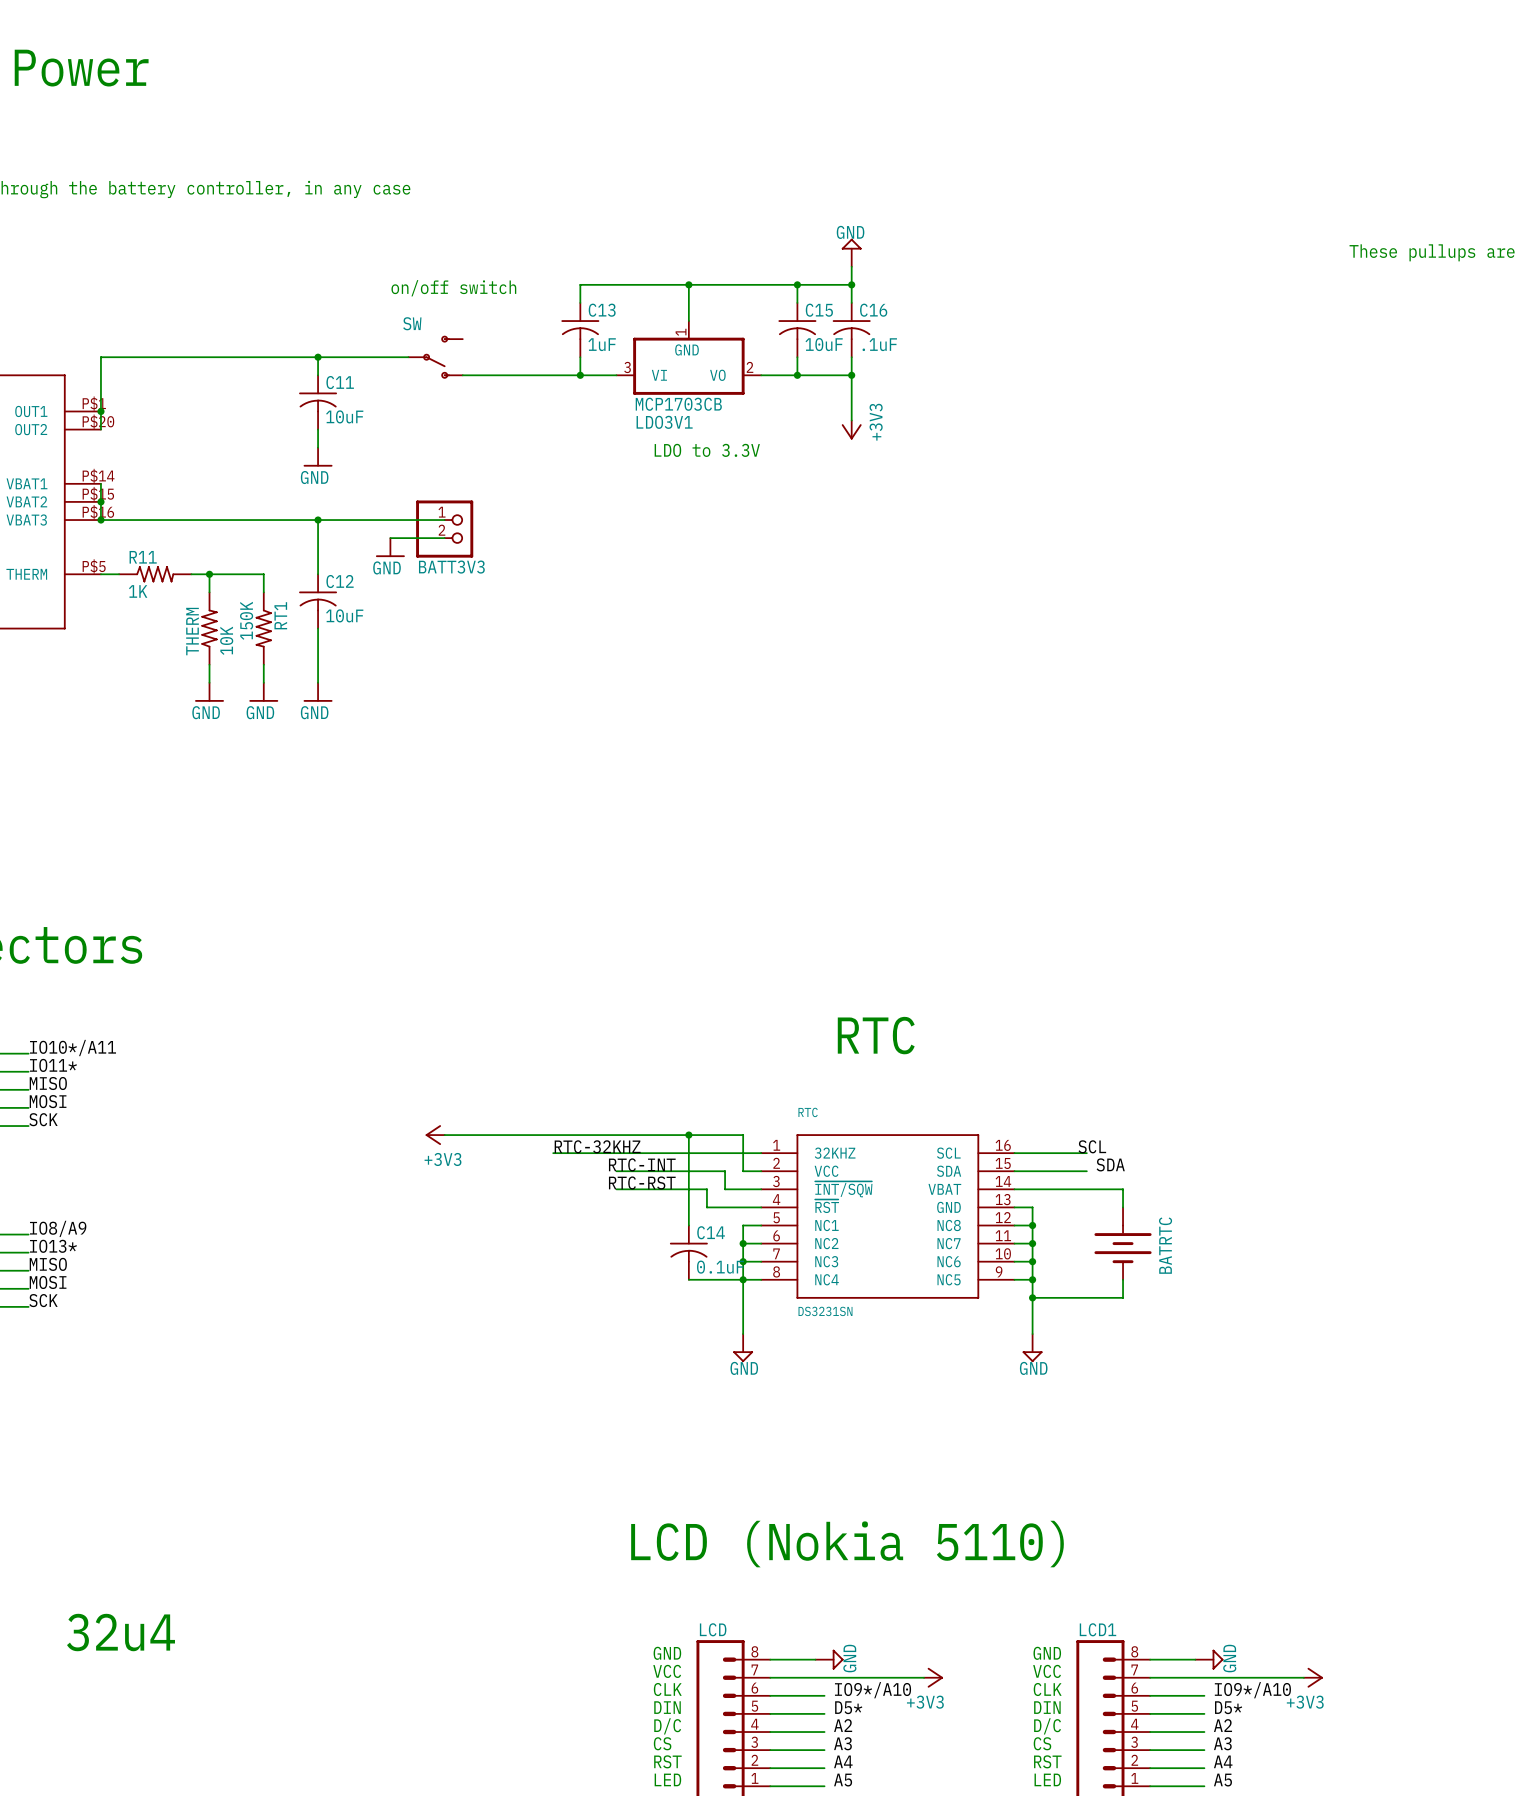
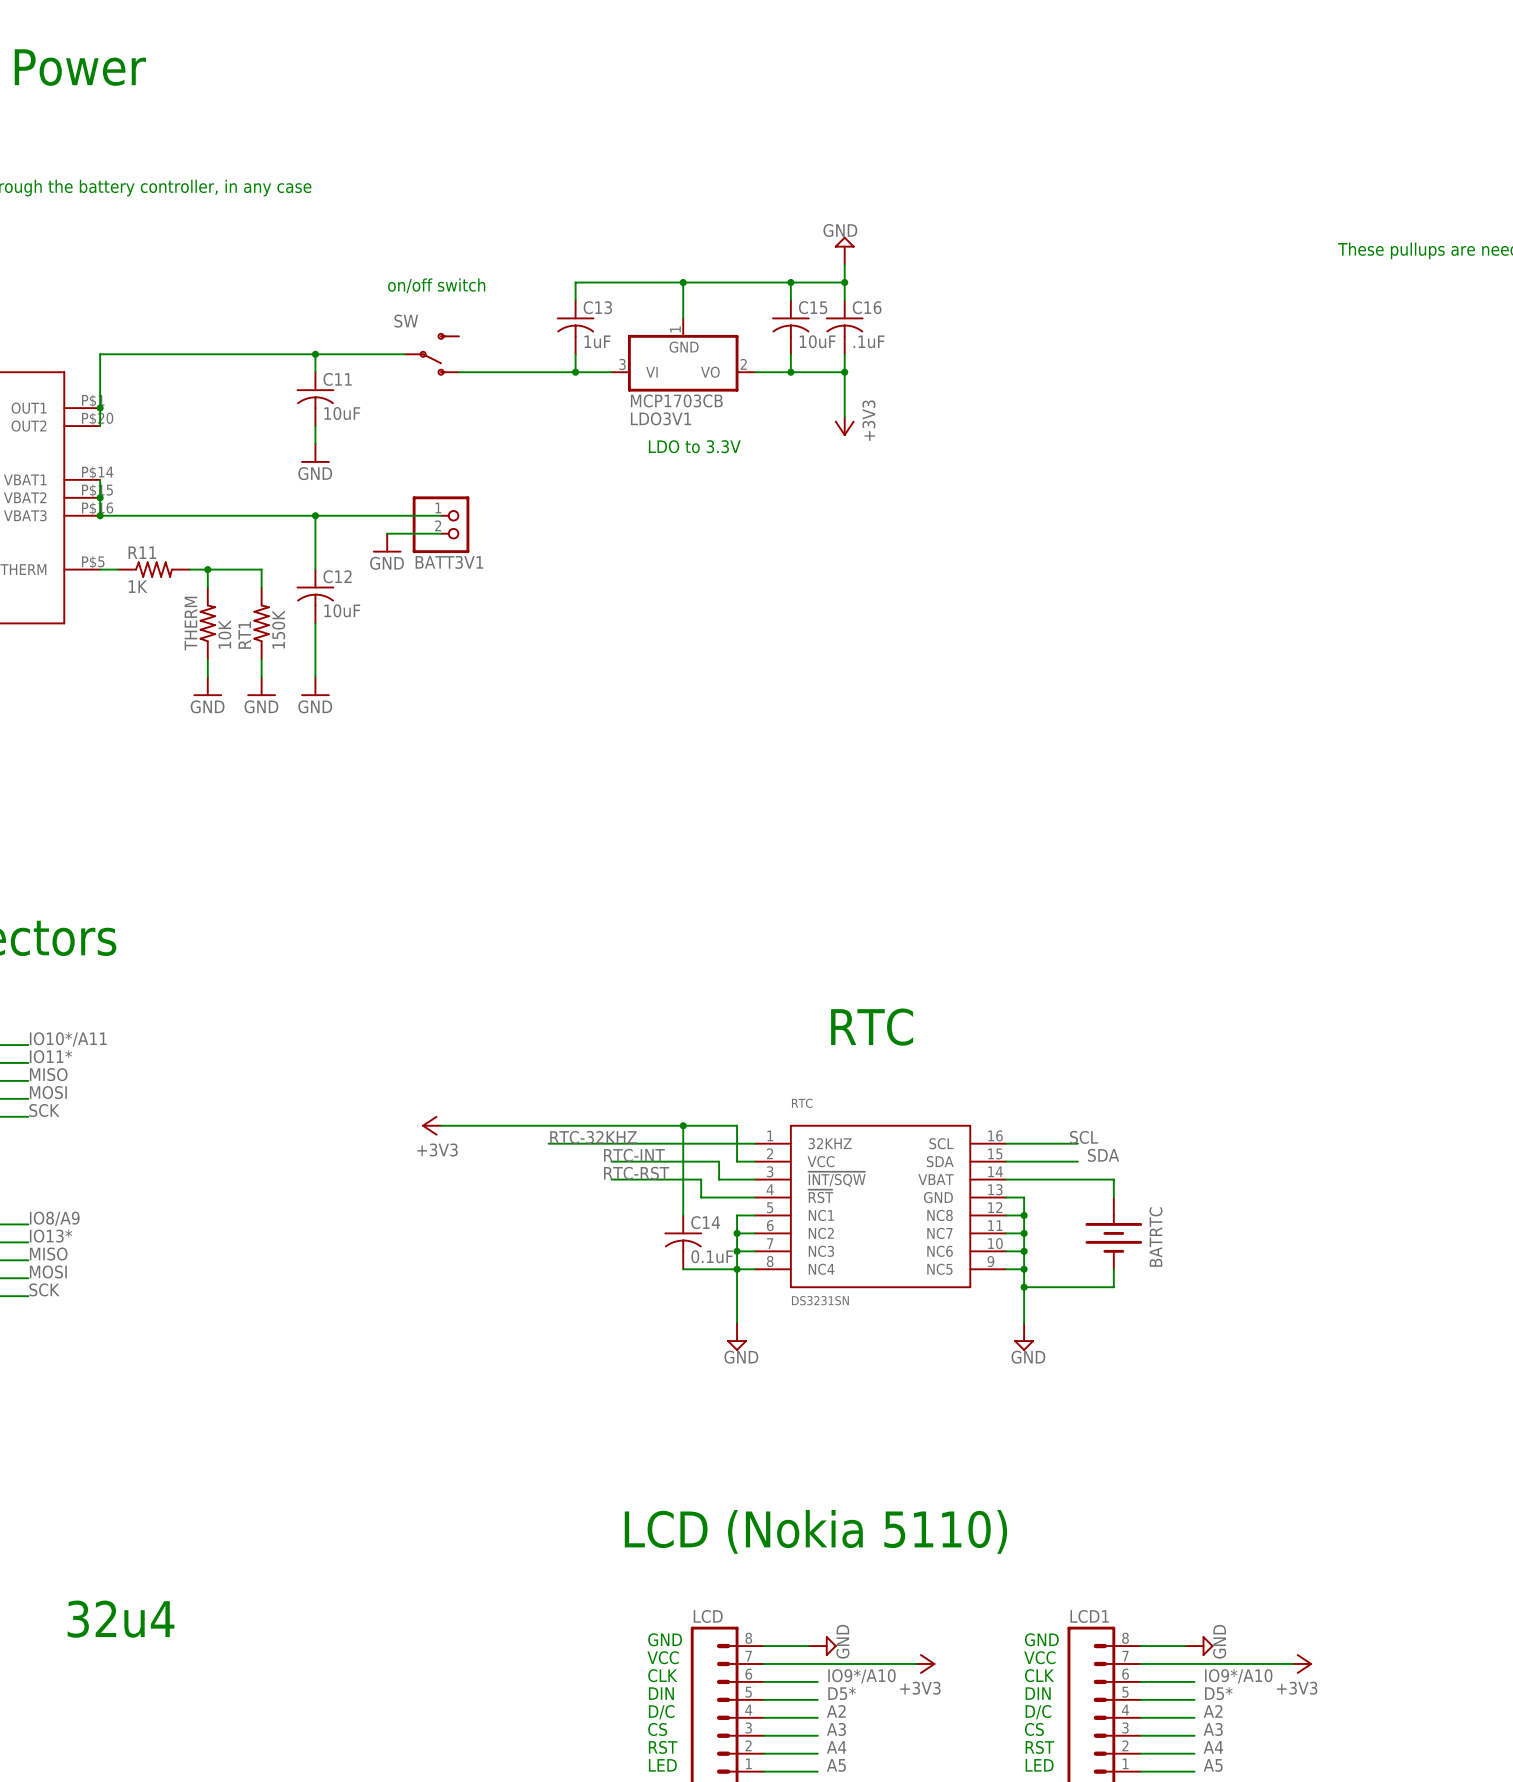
BATT3V3 name: BATT3V3 (451, 567) -> BATT3V1 (449, 562)
RT1 rotation: 0° (263, 628) -> 180° (261, 623)

